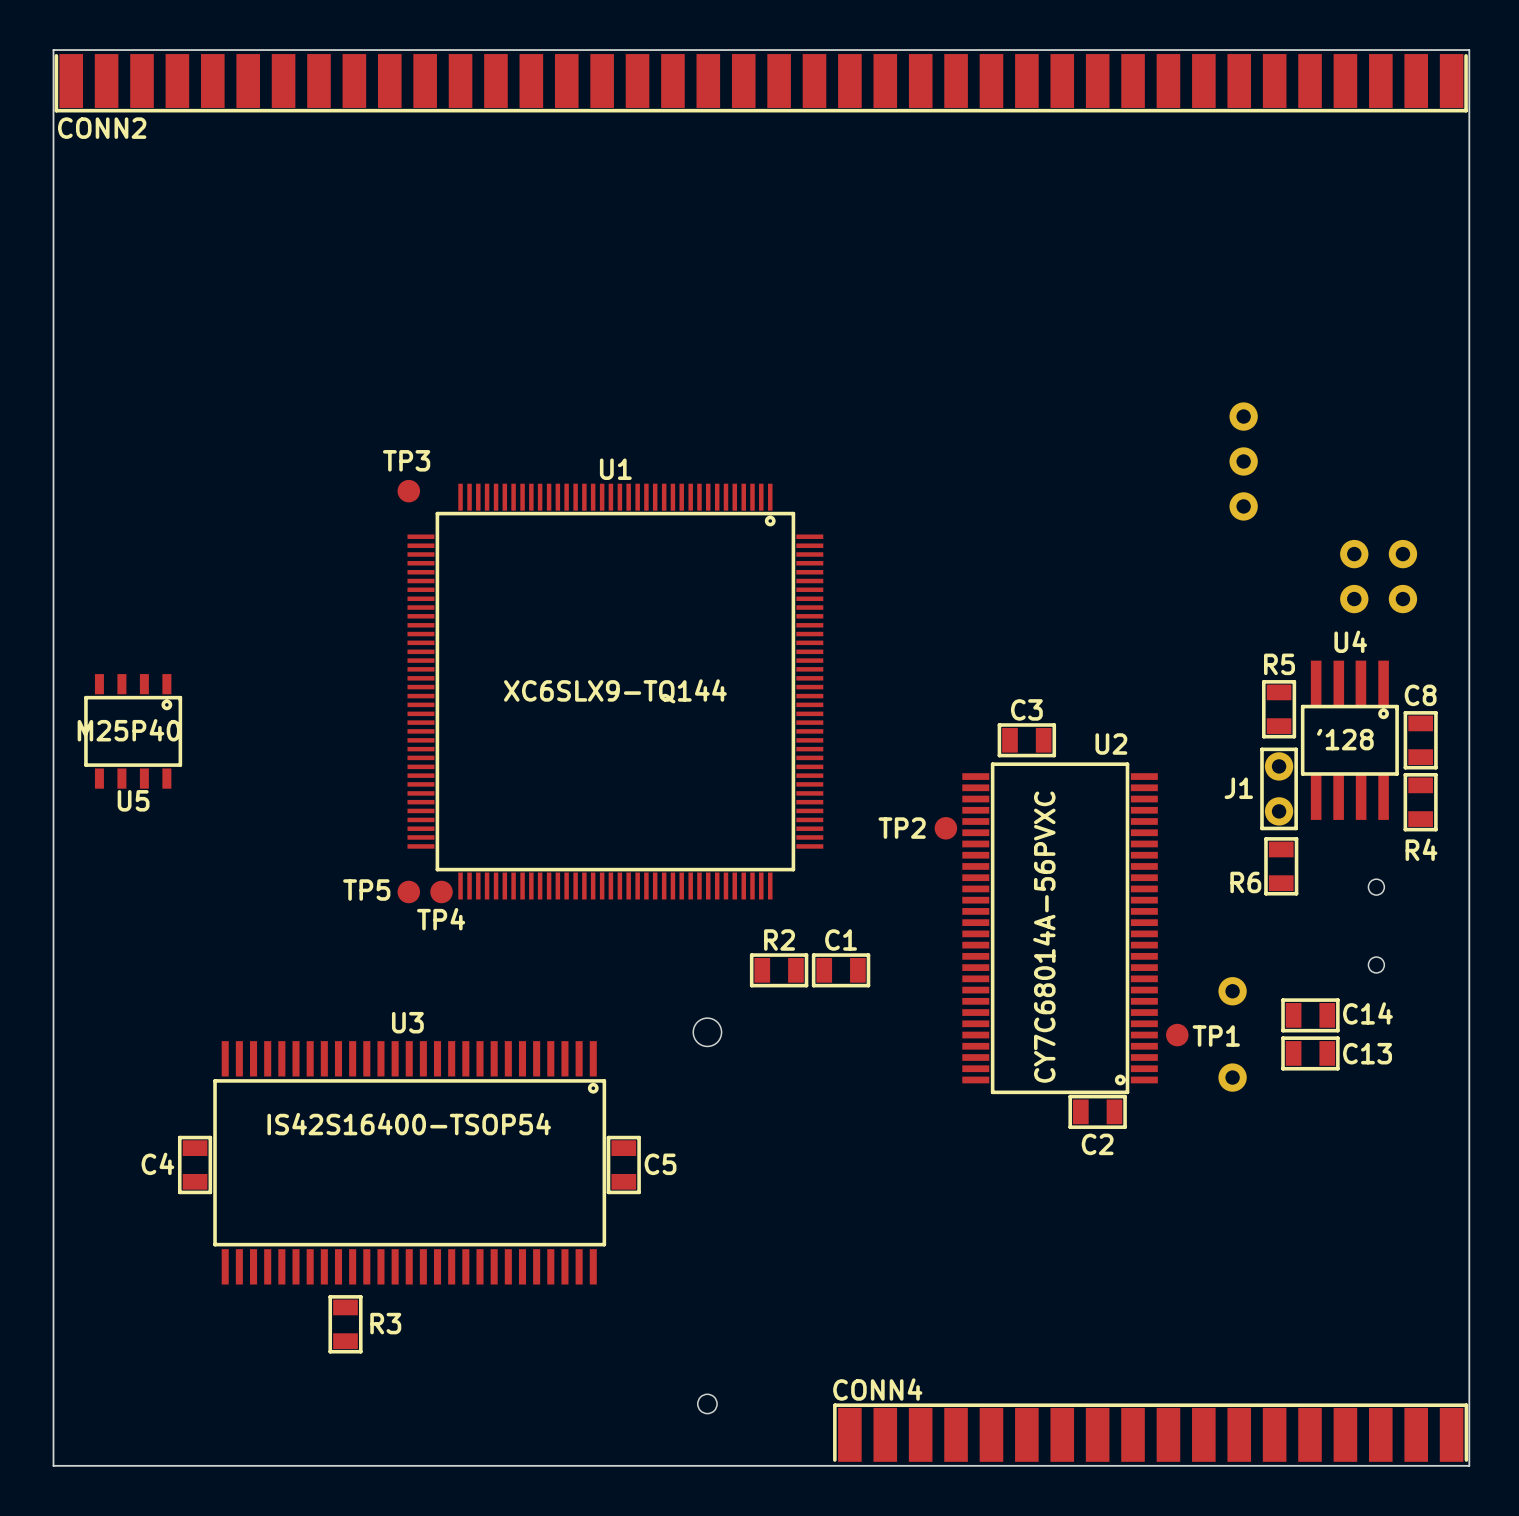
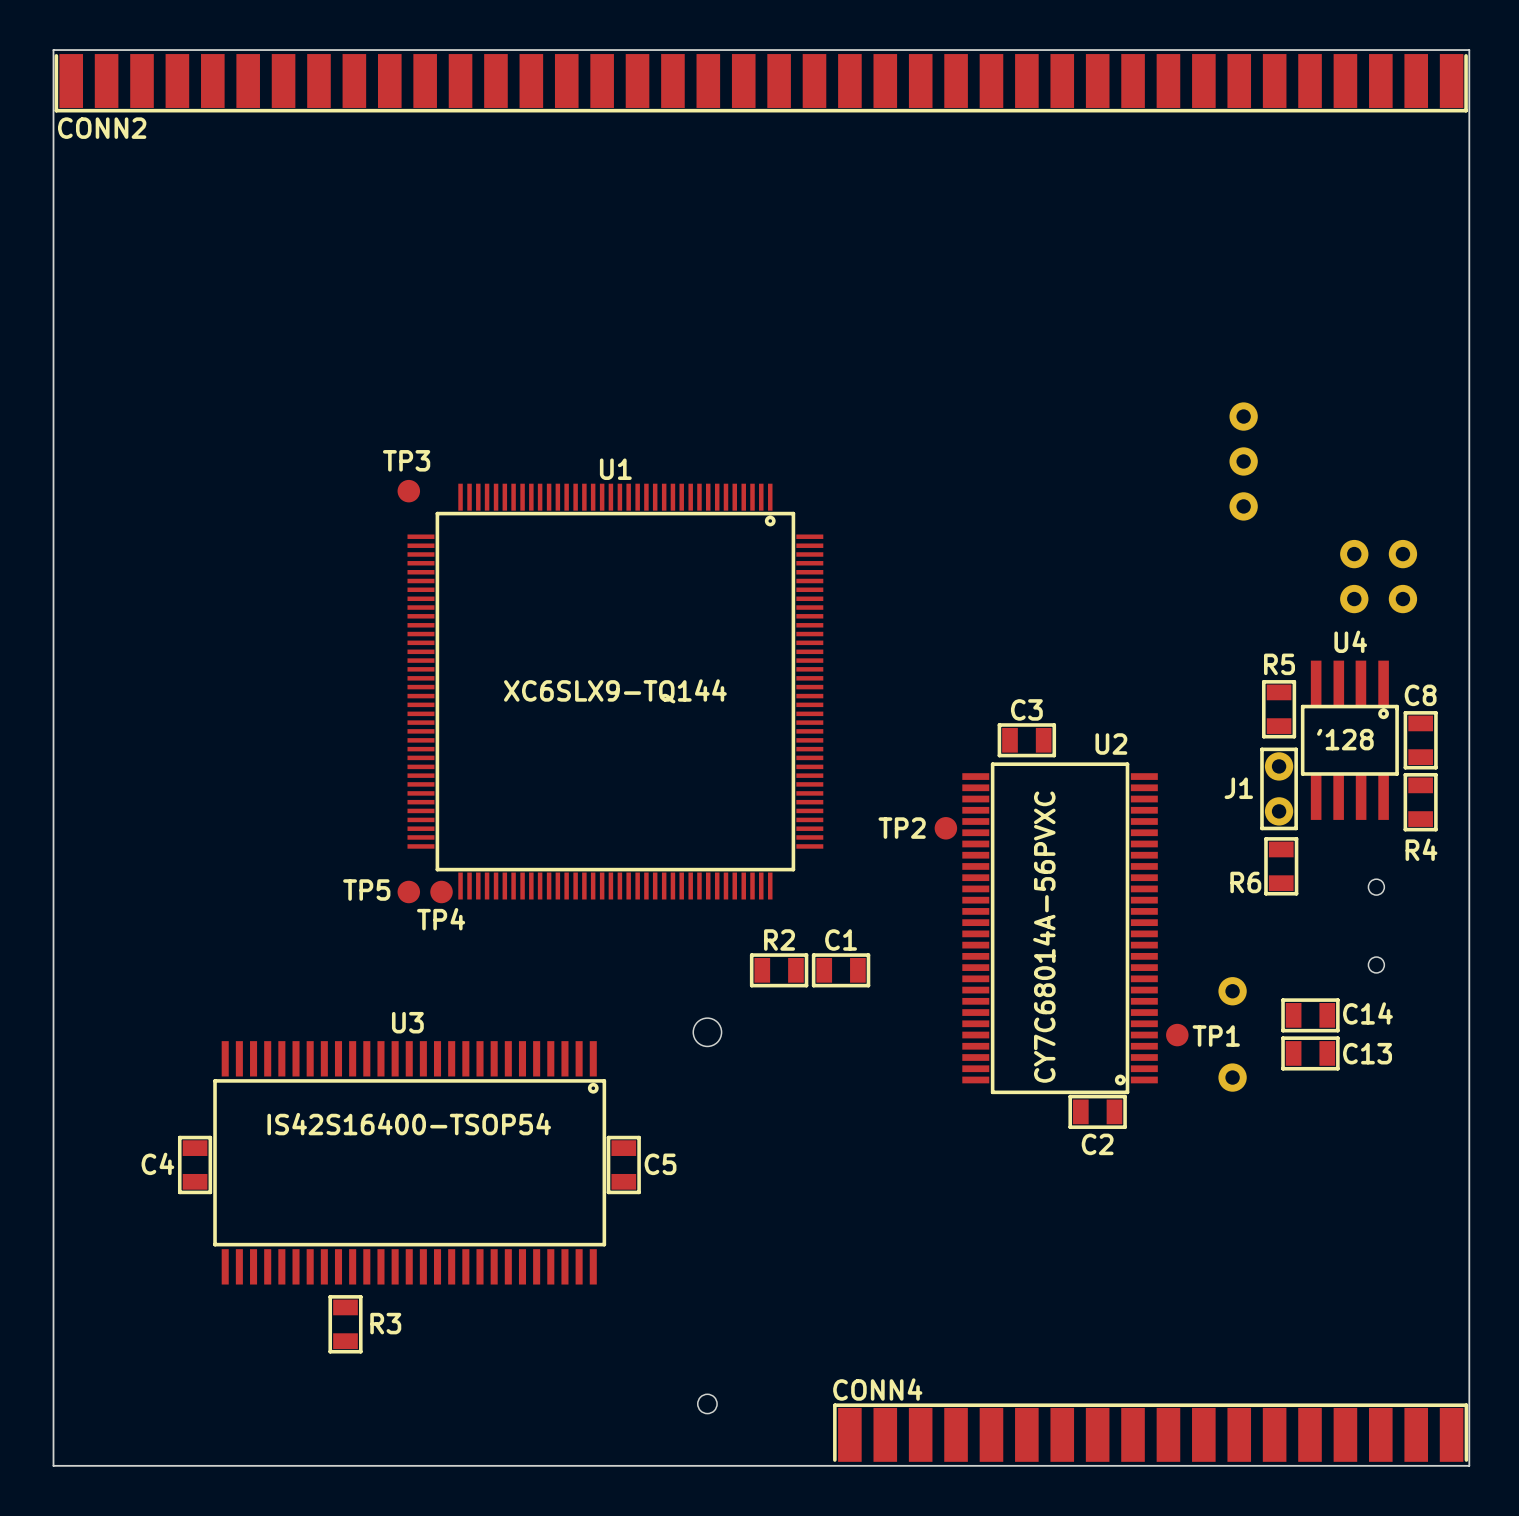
U5: M25P40 (133, 731) -> none

